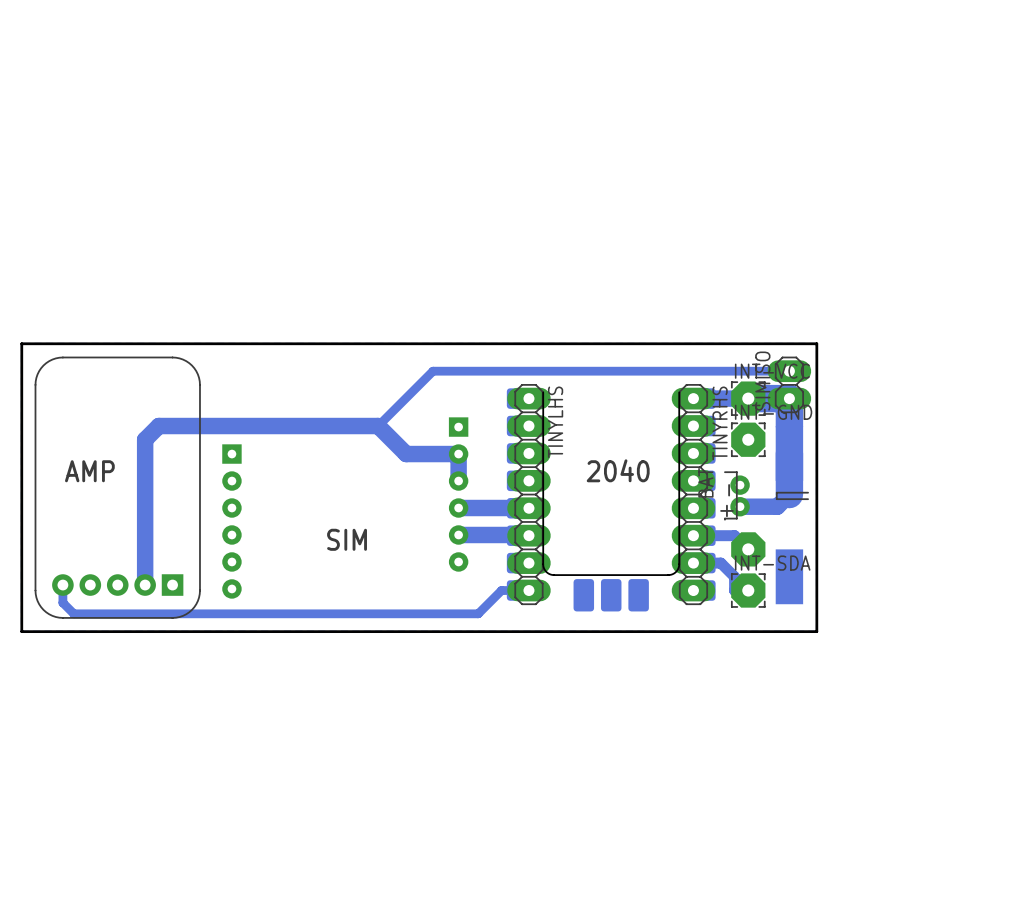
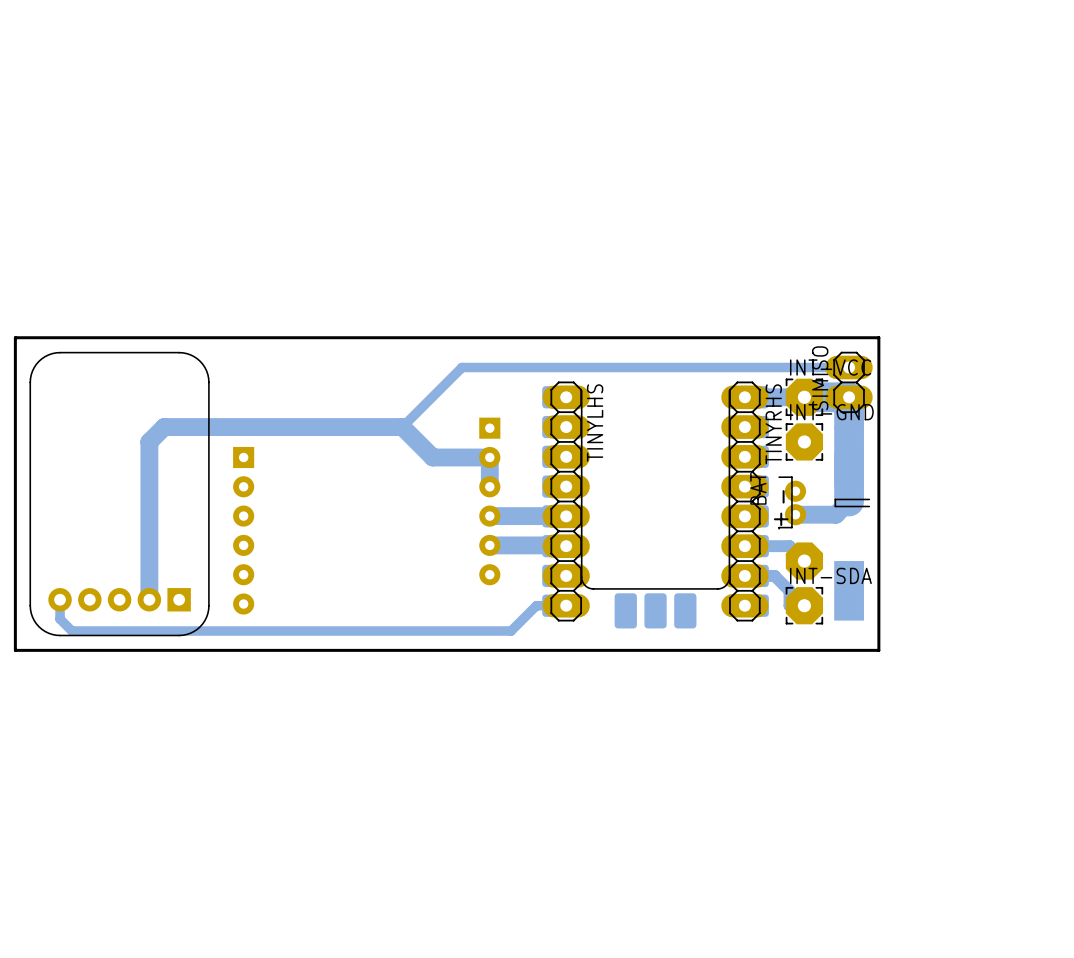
text: 2040 (618, 470) -> none
text: AMP (89, 471) -> none
text: SIM (347, 539) -> none

